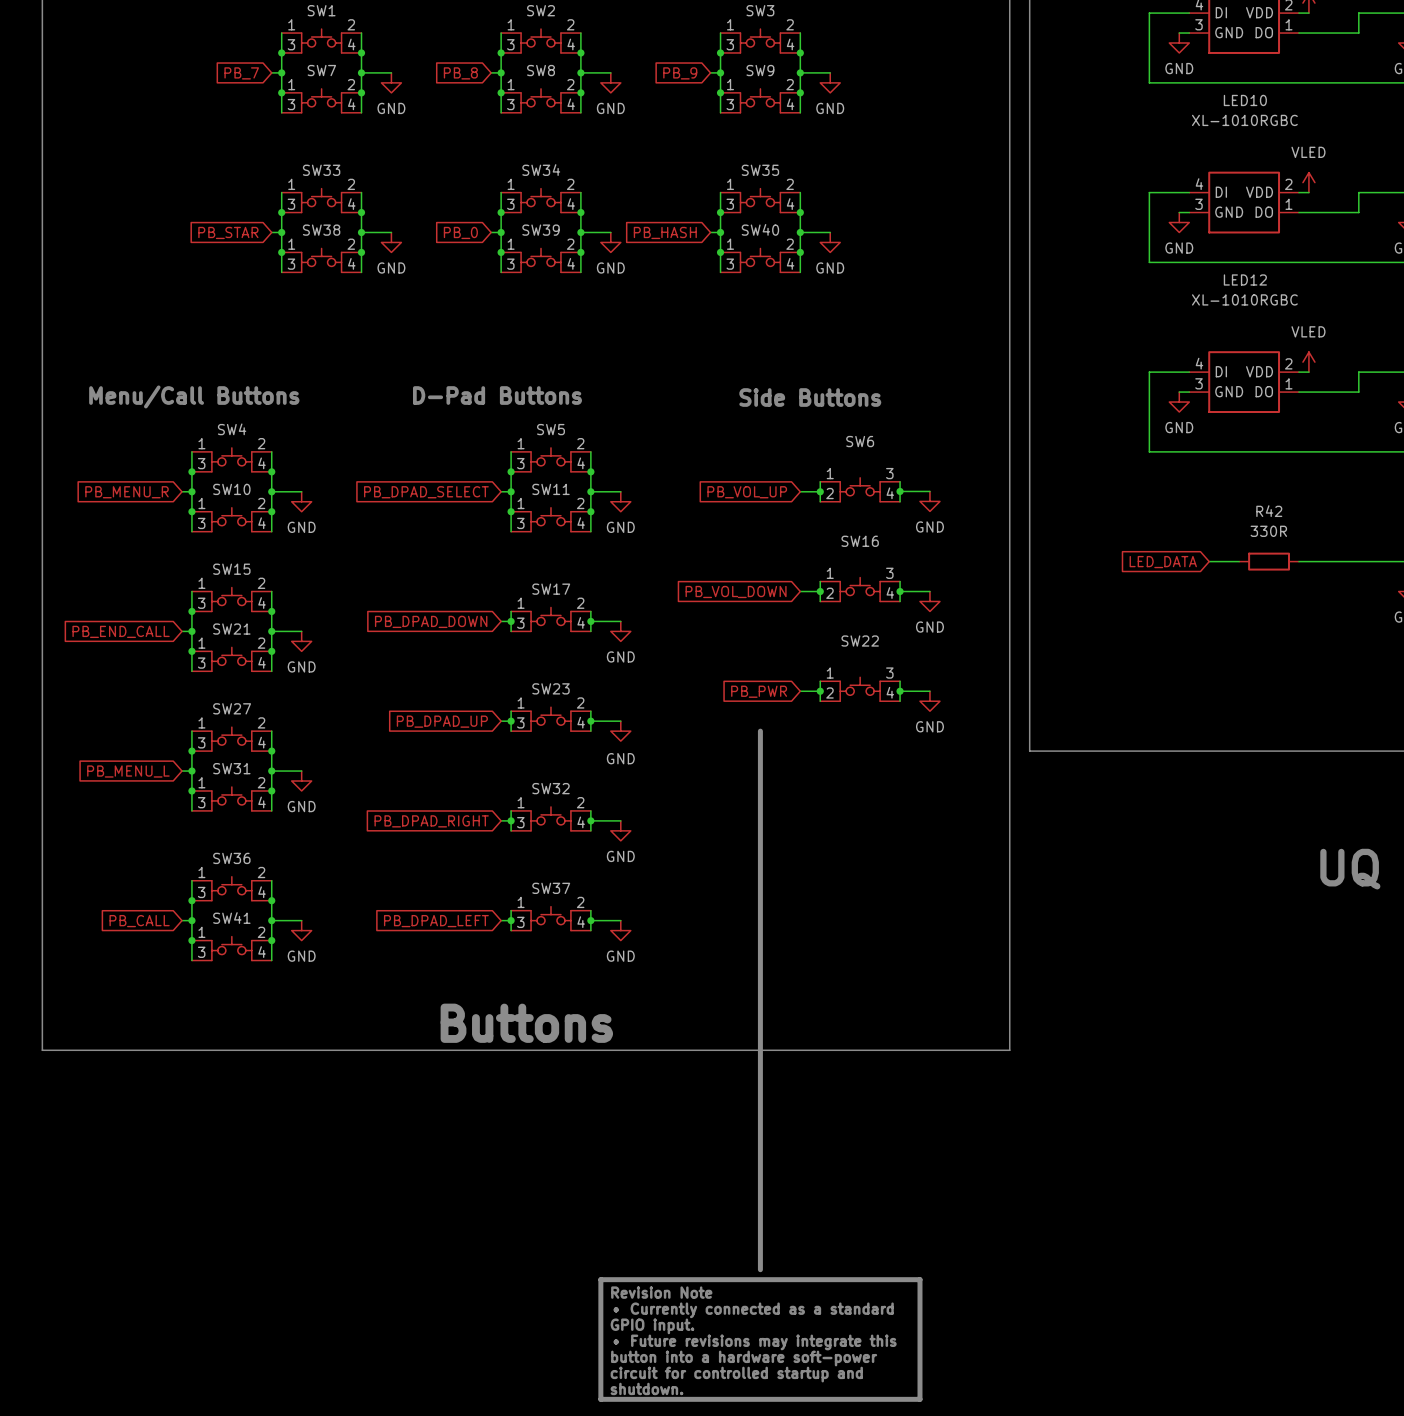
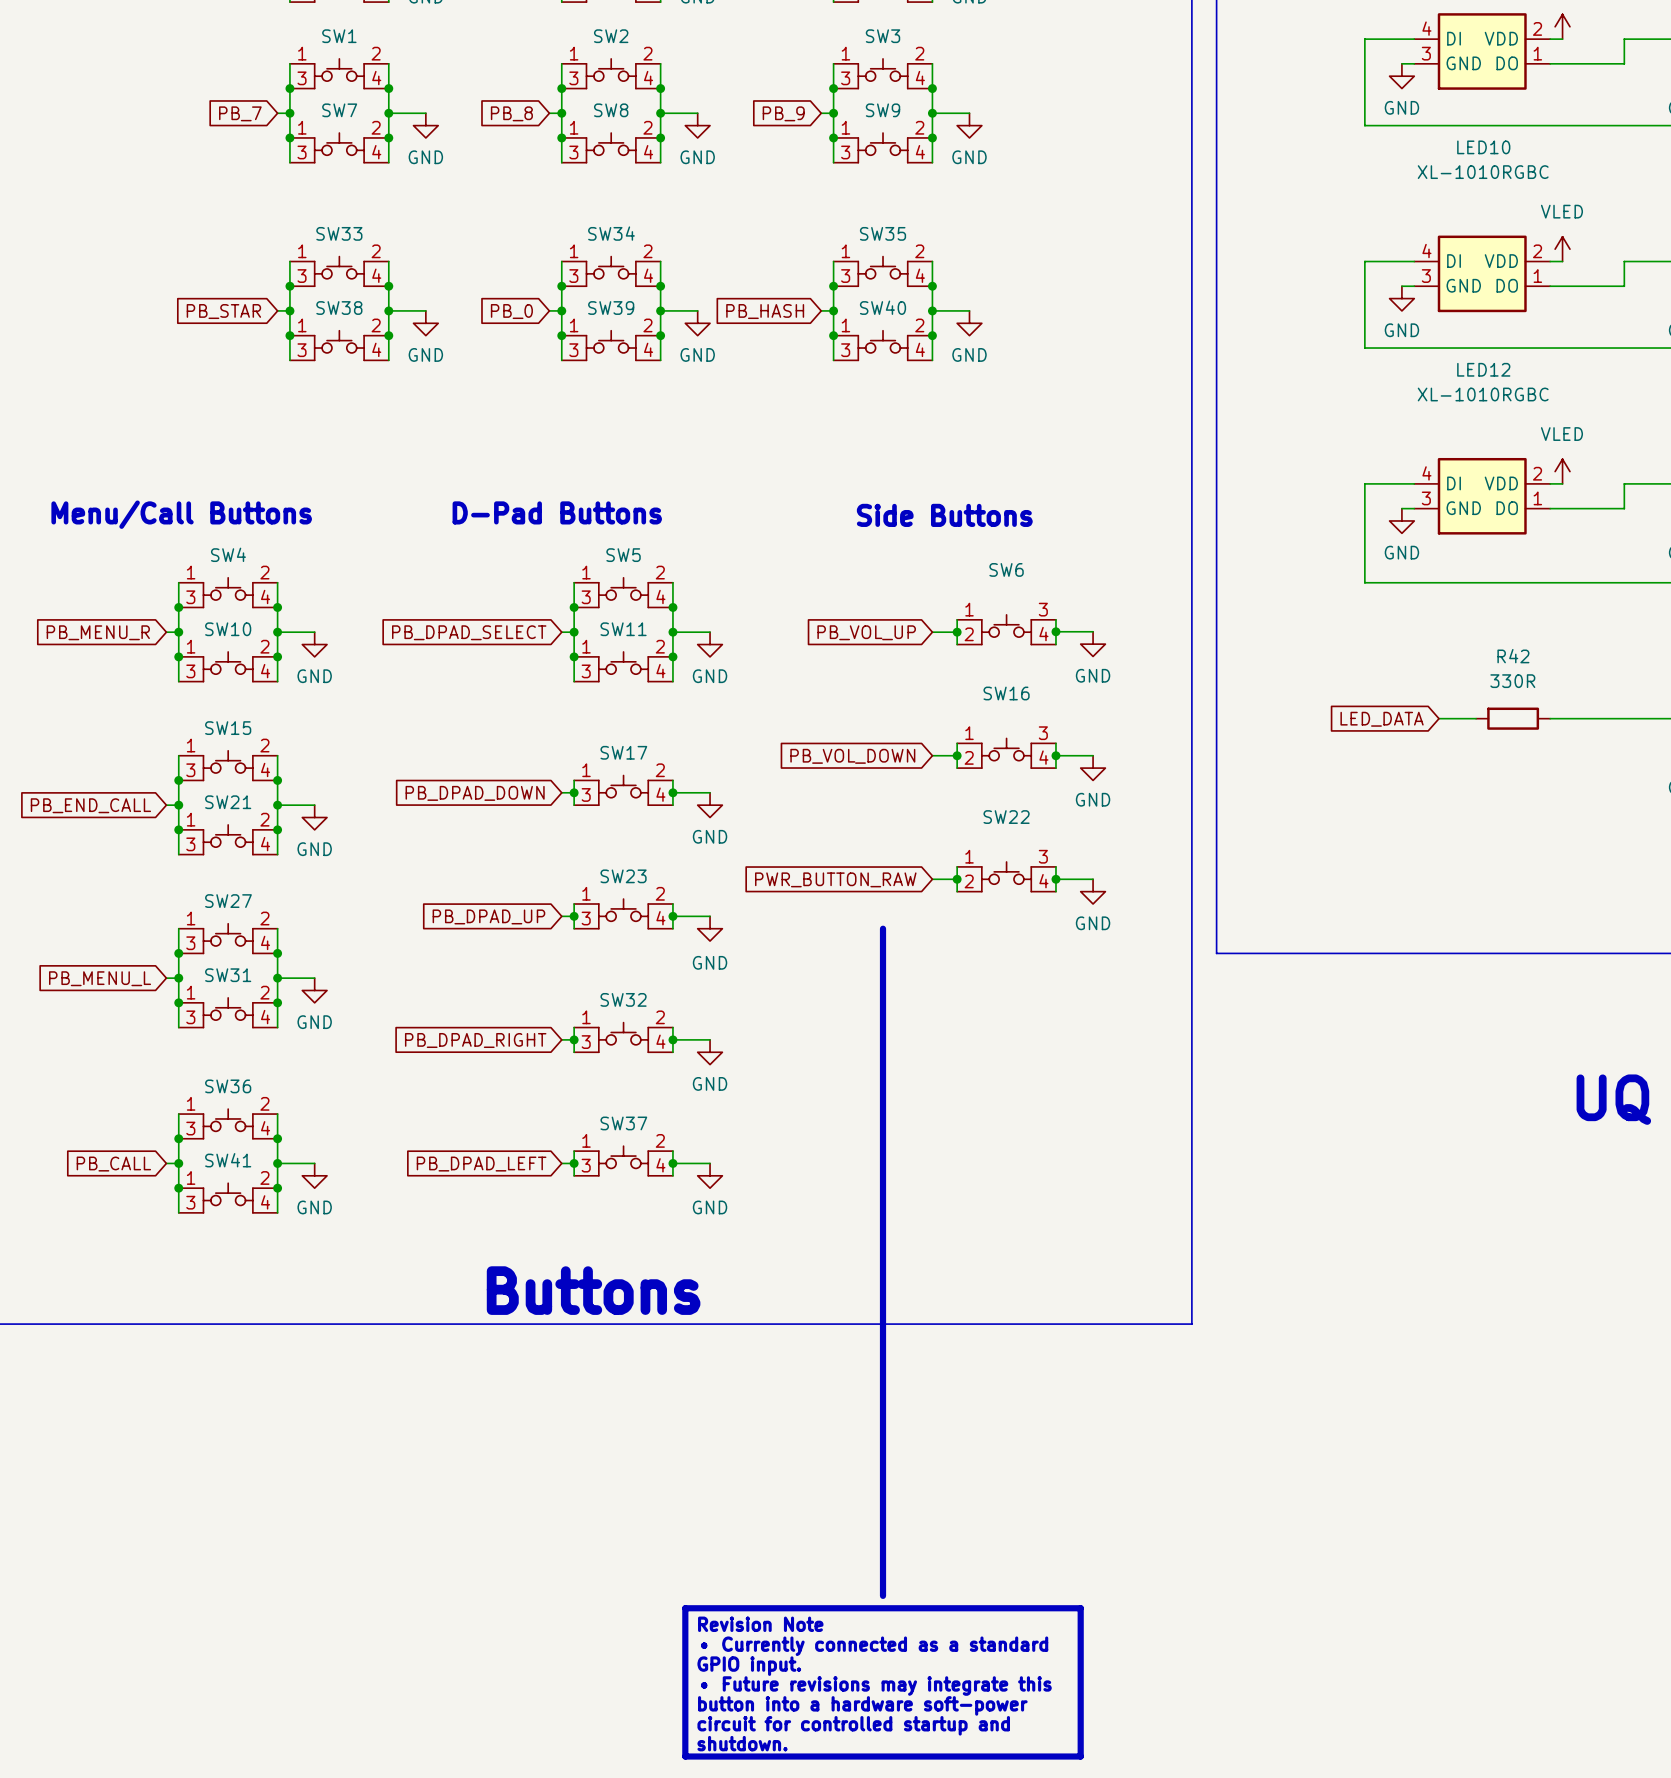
global label: PB_PWR (759, 691) -> PWR_BUTTON_RAW (835, 879)

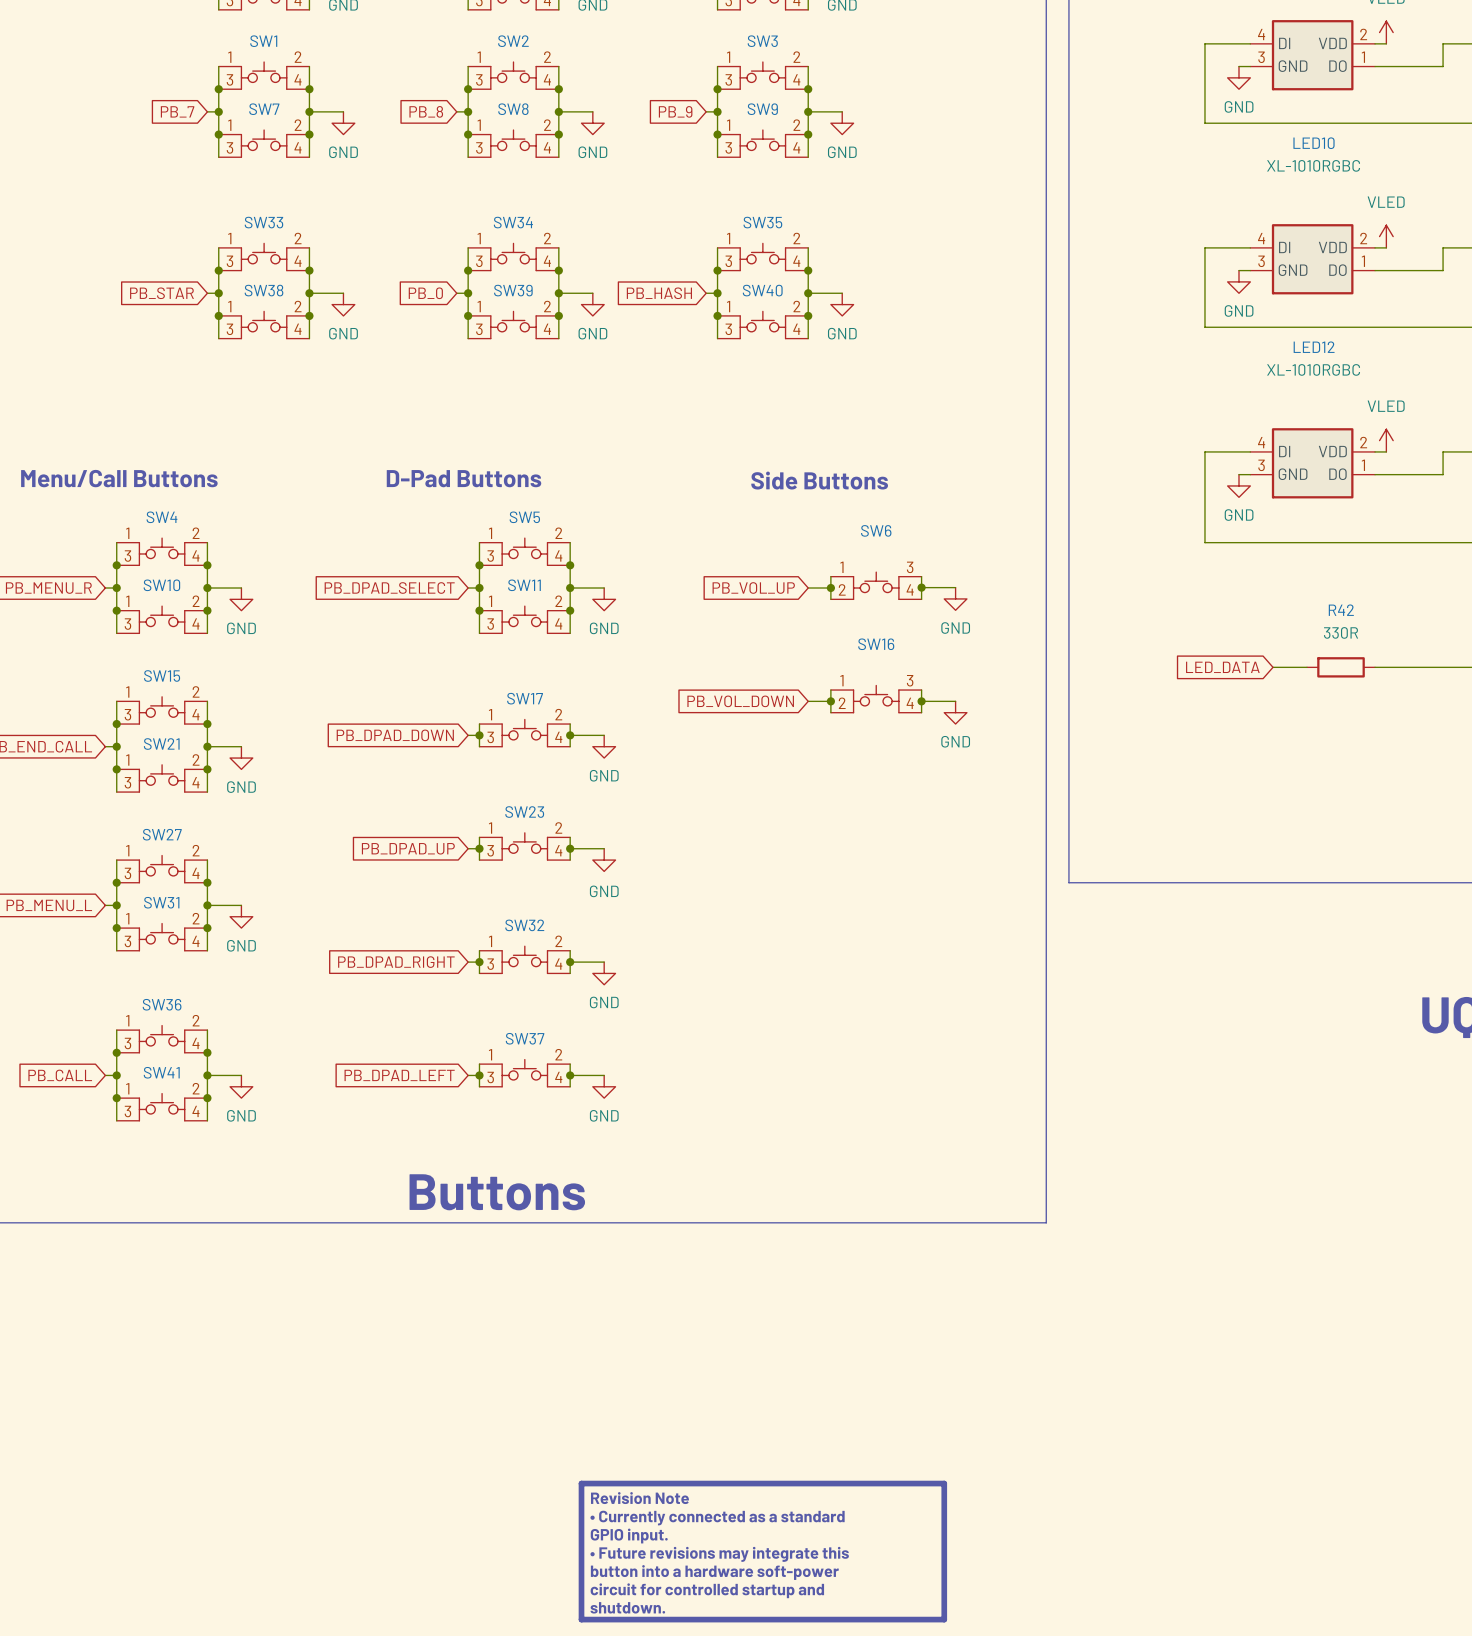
wire: (957, 866) (957, 891) -> none
wire: (1055, 866) (1055, 891) -> none
SW22: (1006, 876) -> none
global label: PWR_BUTTON_RAW (835, 879) -> none
wire: (932, 879) (957, 879) -> none
junction: (957, 879) -> none
wire: (1055, 879) (1093, 879) -> none
junction: (1055, 879) -> none
power symbol: GND (1093, 891) -> none
line: (883, 928) (883, 1595) -> none

